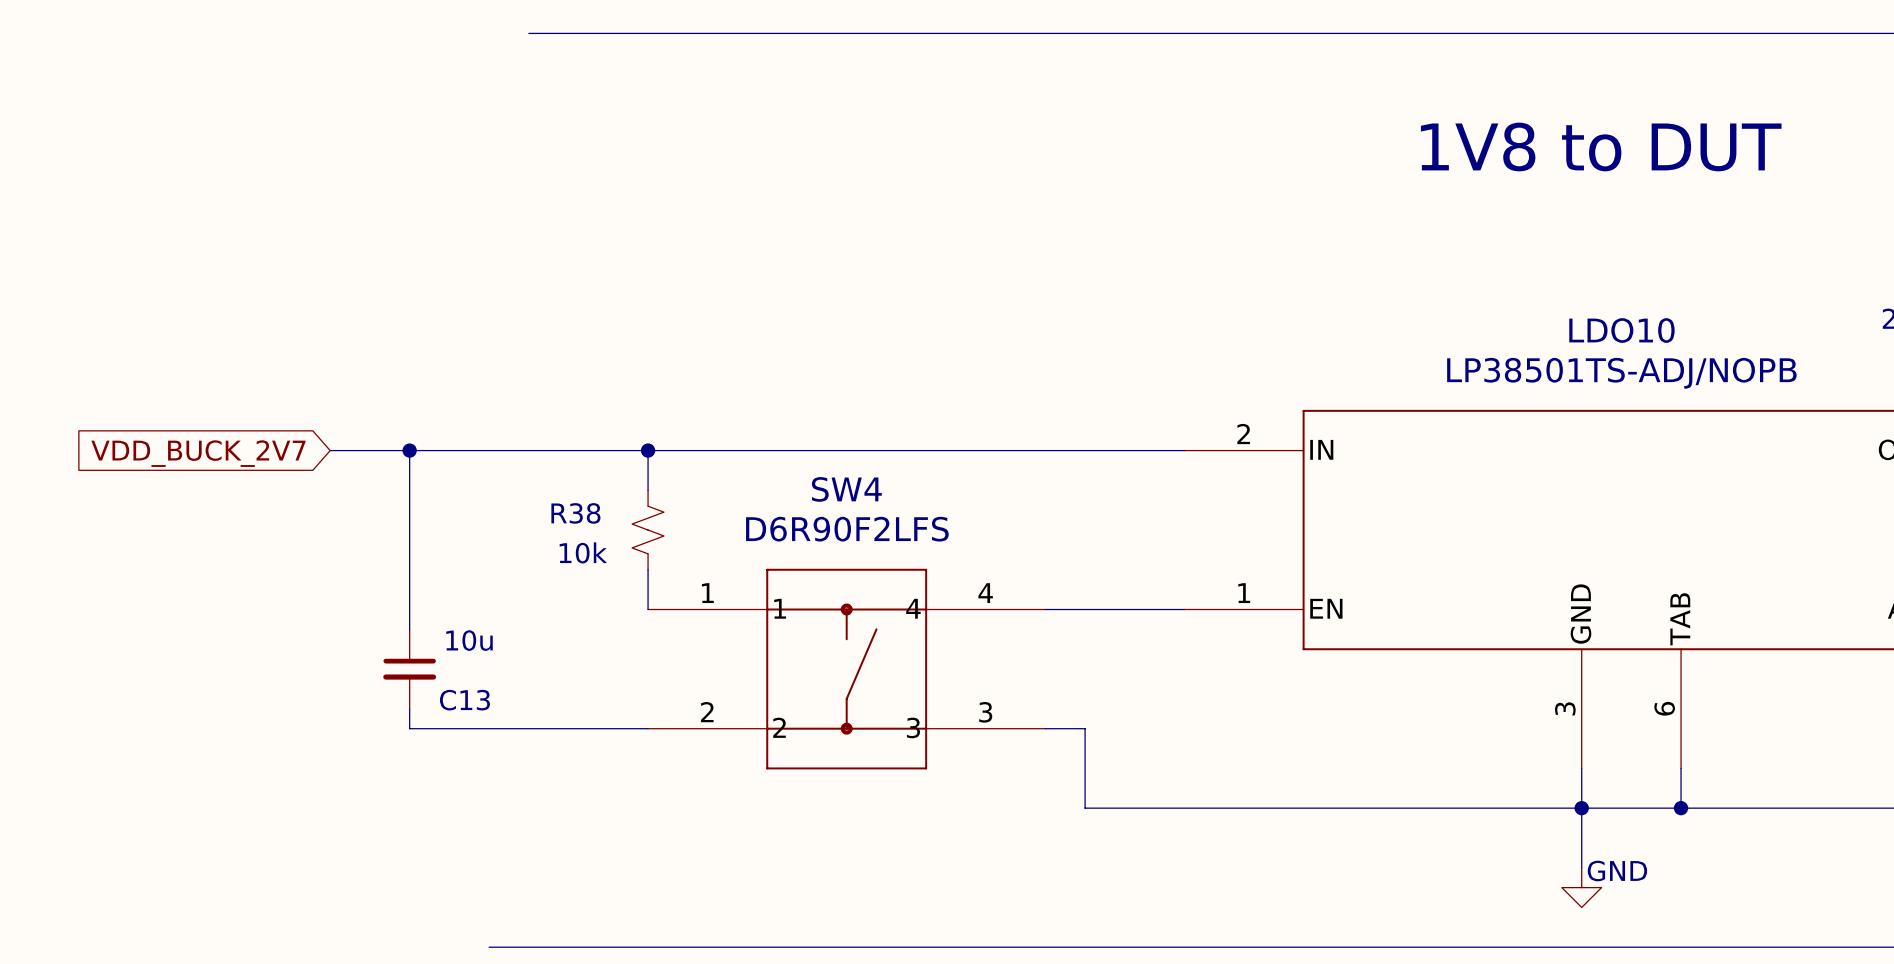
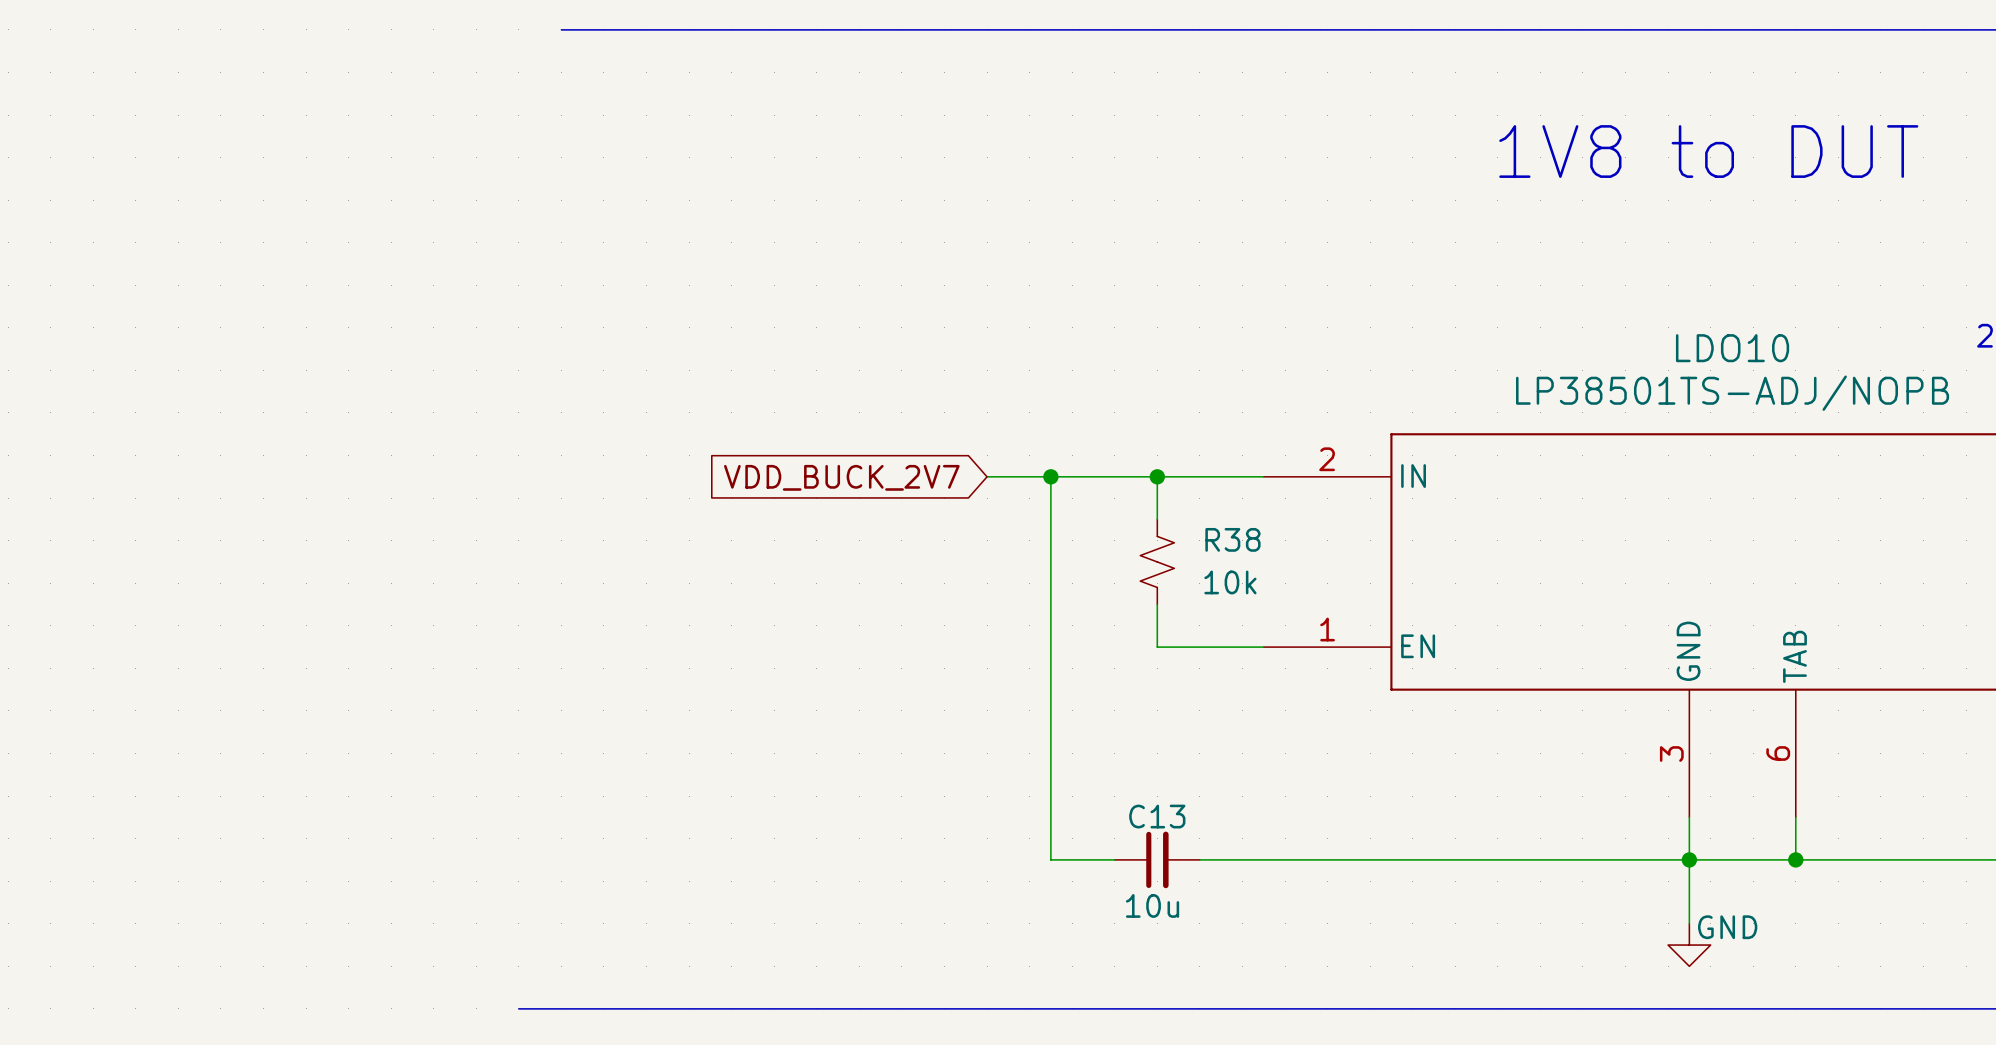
wire: (330, 450) (926, 450) -> none
wire: (409, 450) (409, 629) -> none
junction: (409, 450) -> none
wire: (648, 450) (648, 490) -> none
junction: (648, 450) -> none
wire: none -> (1050, 476) (1050, 859) (1114, 859)
junction: none -> (1050, 476)
wire: none -> (1157, 476) (1157, 519)
junction: none -> (1157, 476)
global label: VDD_BUCK_2V7 (198, 453) -> none
global label: none -> VDD_BUCK_2V7 (841, 477)
R38 name position: R38 (575, 513) -> R38 (1232, 539)
R38 position: (648, 530) -> (1157, 561)
R38 value position: 10k (583, 552) -> 10k (1230, 582)
wire: (648, 569) (648, 609) -> none
wire: (1045, 609) (1085, 609) -> (1157, 604) (1157, 647)
C13 value position: 10u (469, 640) -> 10u (1152, 905)
C13 rotation: 0° (409, 669) -> 90° counterclockwise (1157, 859)
C13 position: (409, 669) -> (1157, 859)
SW4: D6R90F2LFS (846, 669) -> none
C13 name position: C13 (464, 700) -> C13 (1157, 816)
wire: (409, 708) (409, 728) (648, 728) -> none
wire: (1045, 728) (1085, 728) (1085, 808) (1124, 808) -> none

